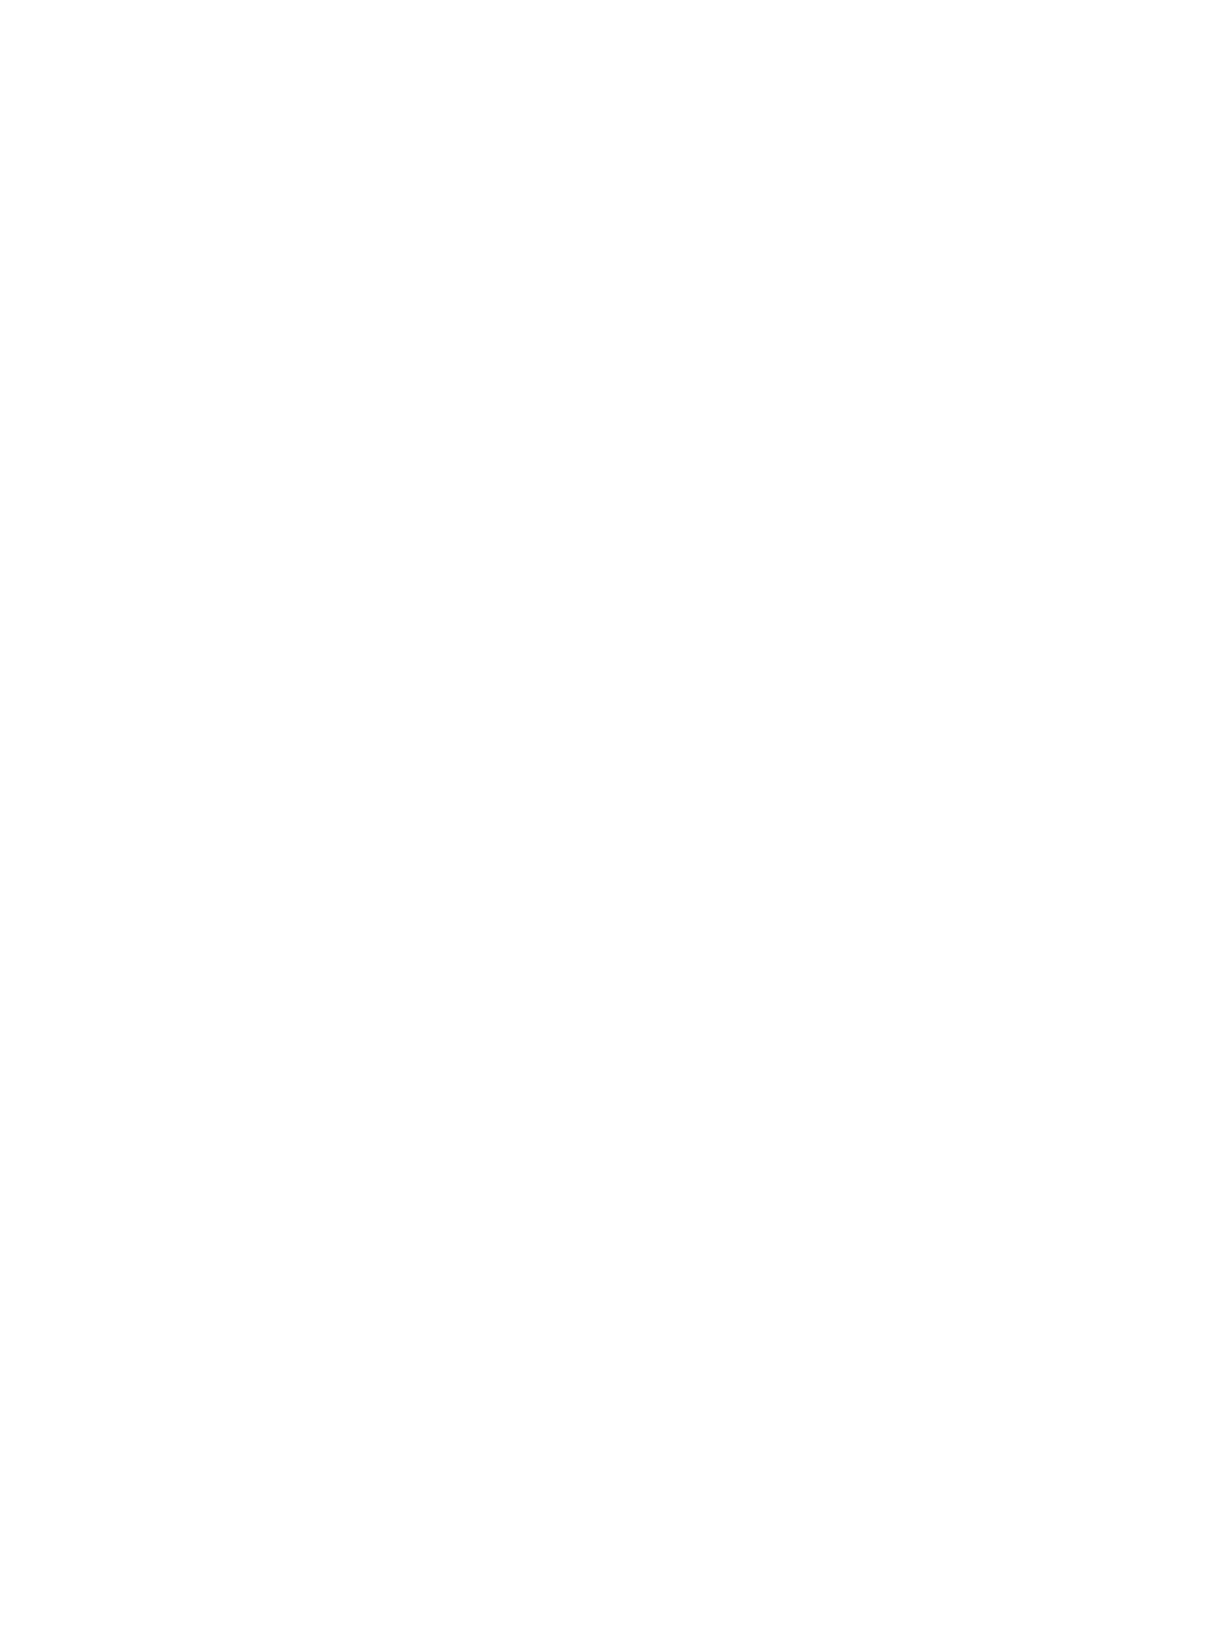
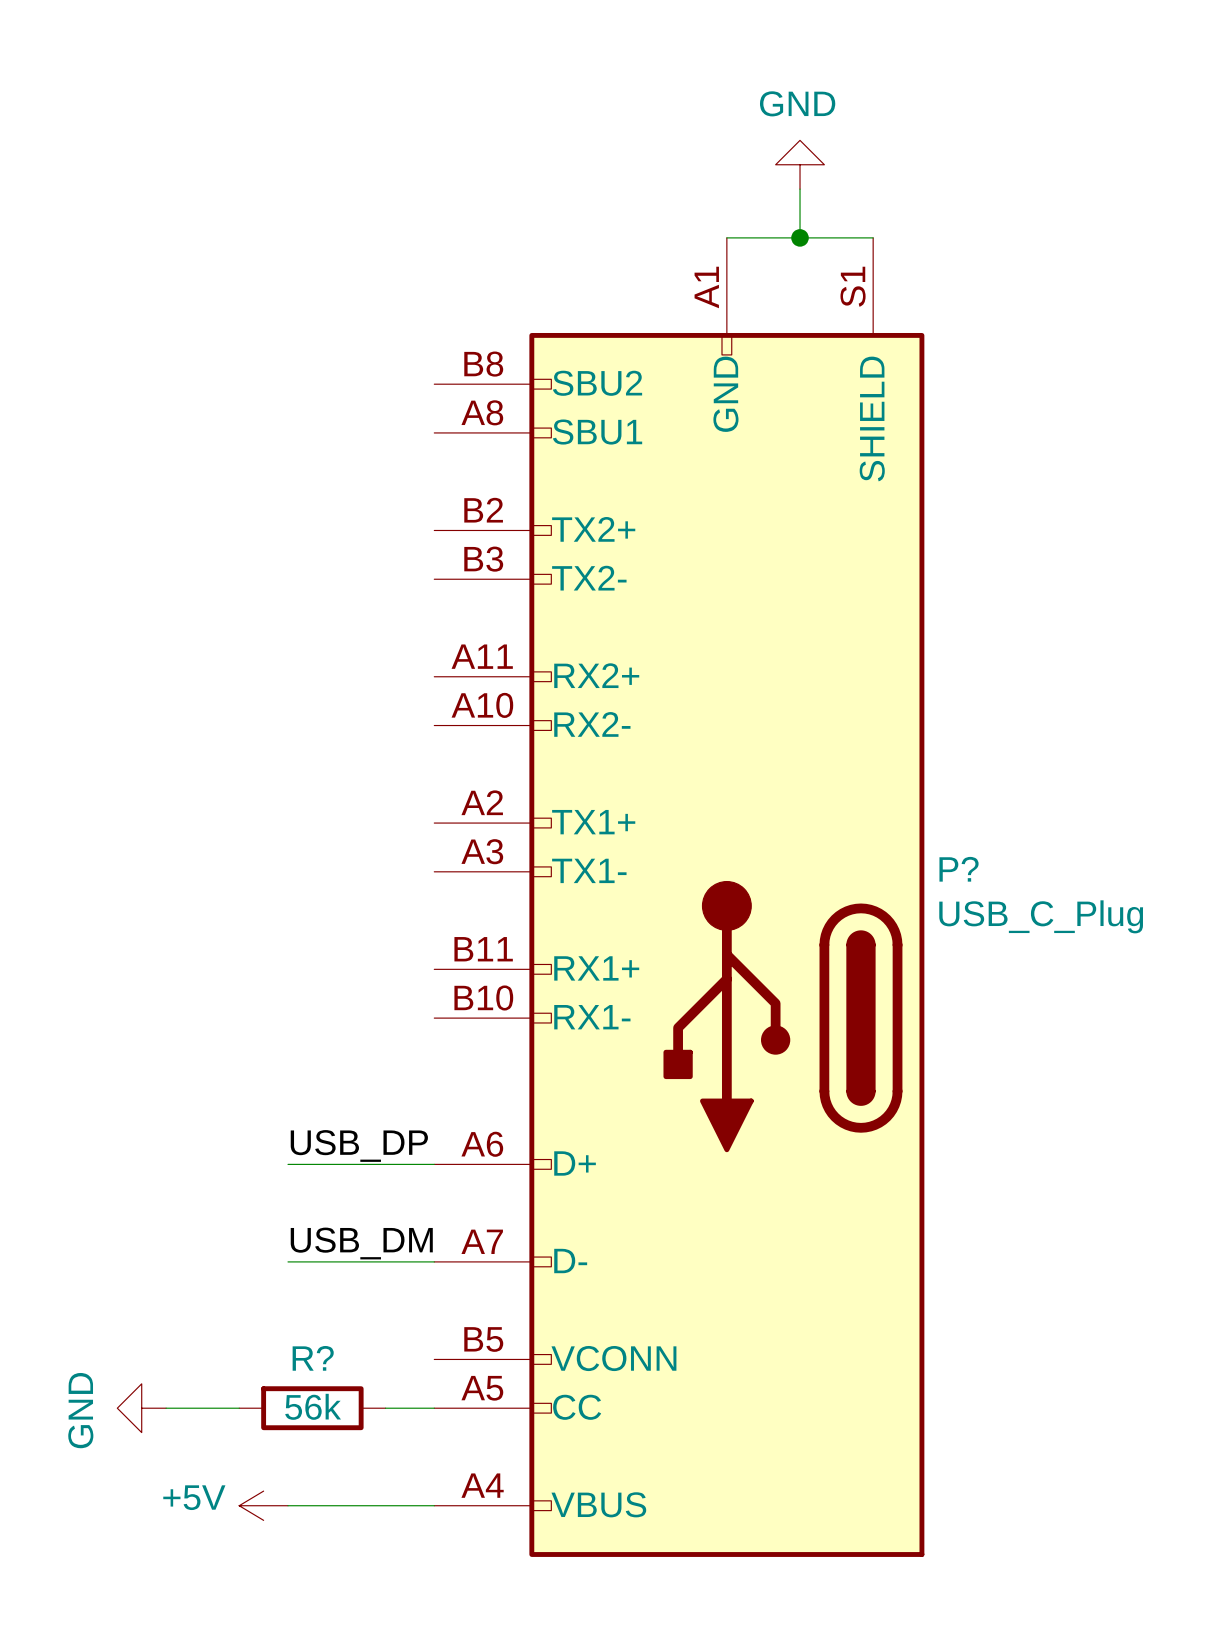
power symbol: none -> GND (800, 164)
wire: none -> (800, 189) (800, 237)
wire: none -> (726, 237) (873, 237)
junction: none -> (800, 237)
P?: none -> USB_C_Plug (679, 897)
label: none -> USB_DP (359, 1145)
wire: none -> (288, 1164) (434, 1164)
label: none -> USB_DM (361, 1243)
wire: none -> (288, 1261) (434, 1261)
power symbol: none -> GND (141, 1408)
wire: none -> (166, 1408) (239, 1408)
R?: none -> 56k (312, 1408)
wire: none -> (385, 1408) (434, 1408)
power symbol: none -> +5V (263, 1505)
wire: none -> (288, 1505) (434, 1505)

